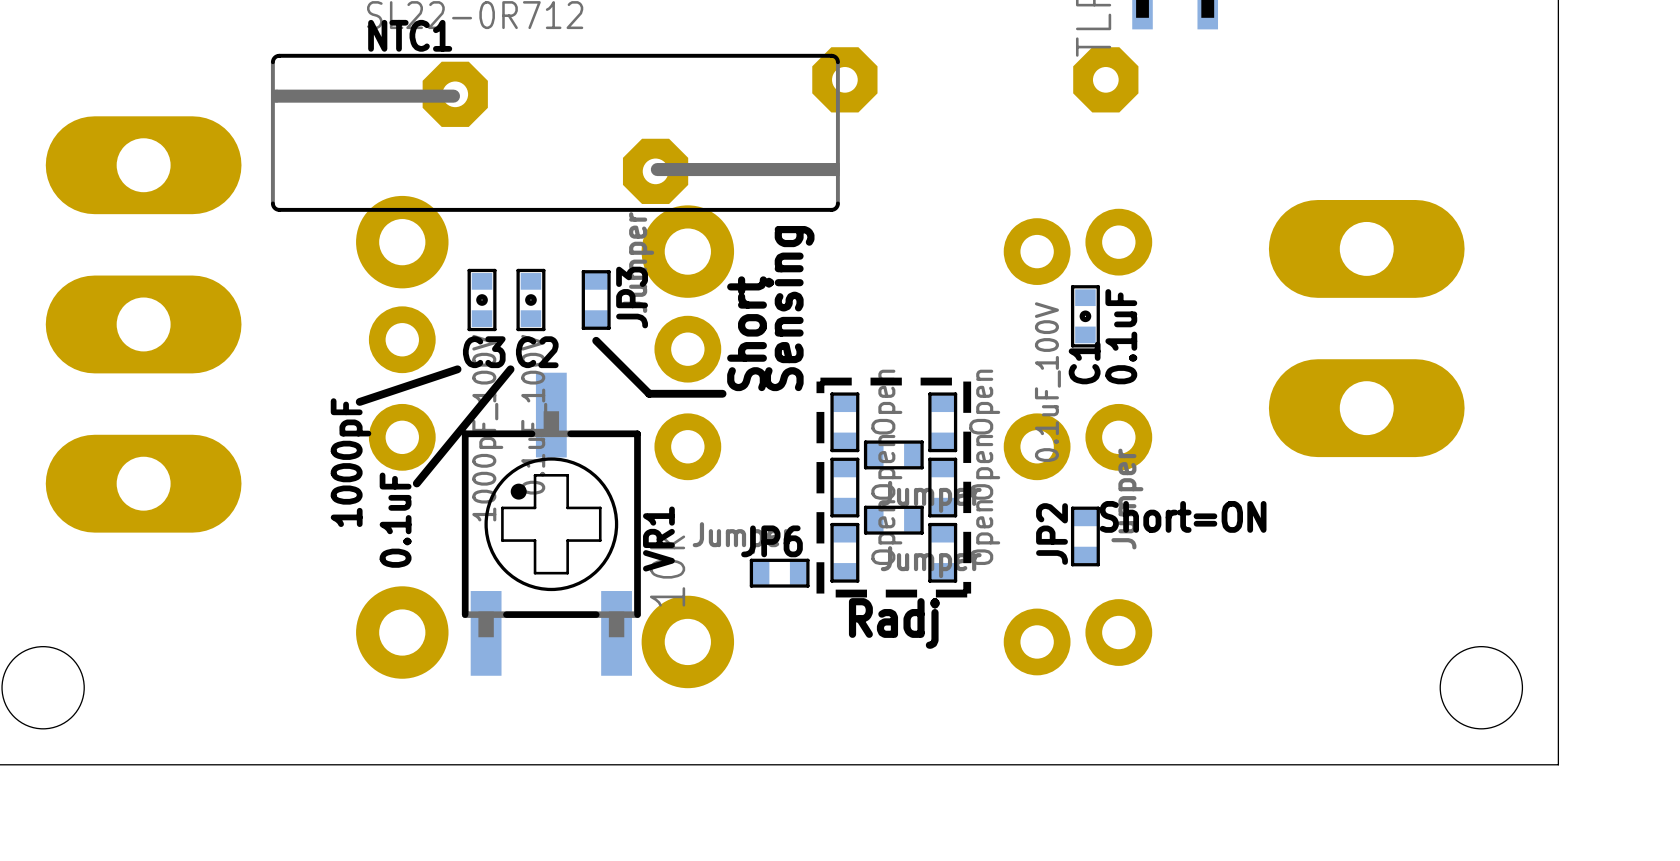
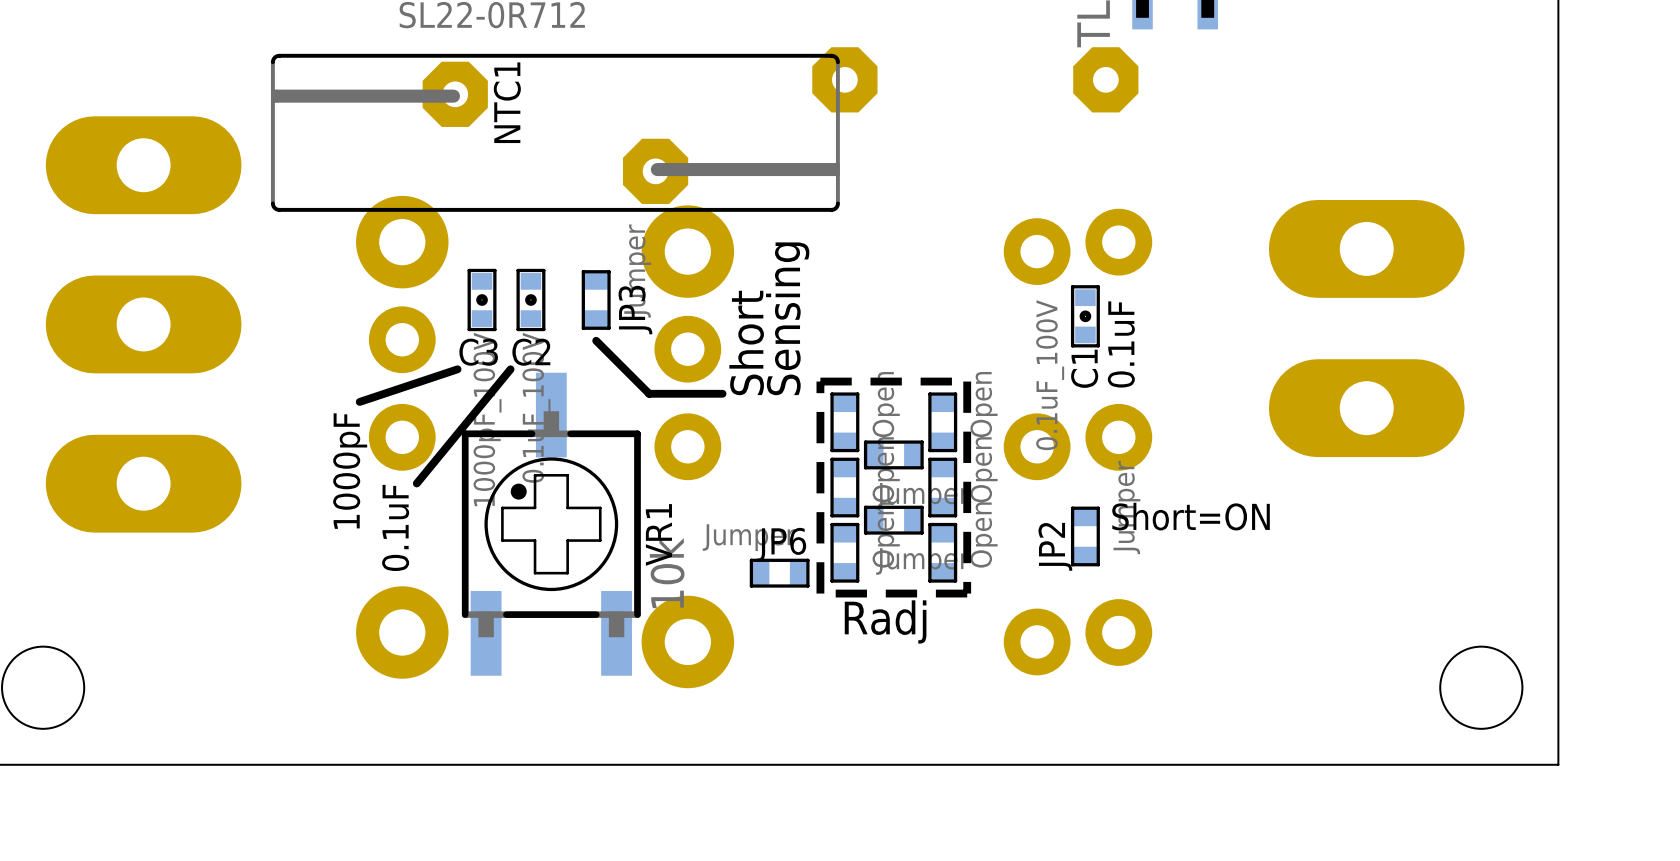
NTC1 name rotation: 0° (410, 35) -> 90° counterclockwise (507, 102)
NTC1 name position: NTC1 (410, 35) -> NTC1 (507, 102)

